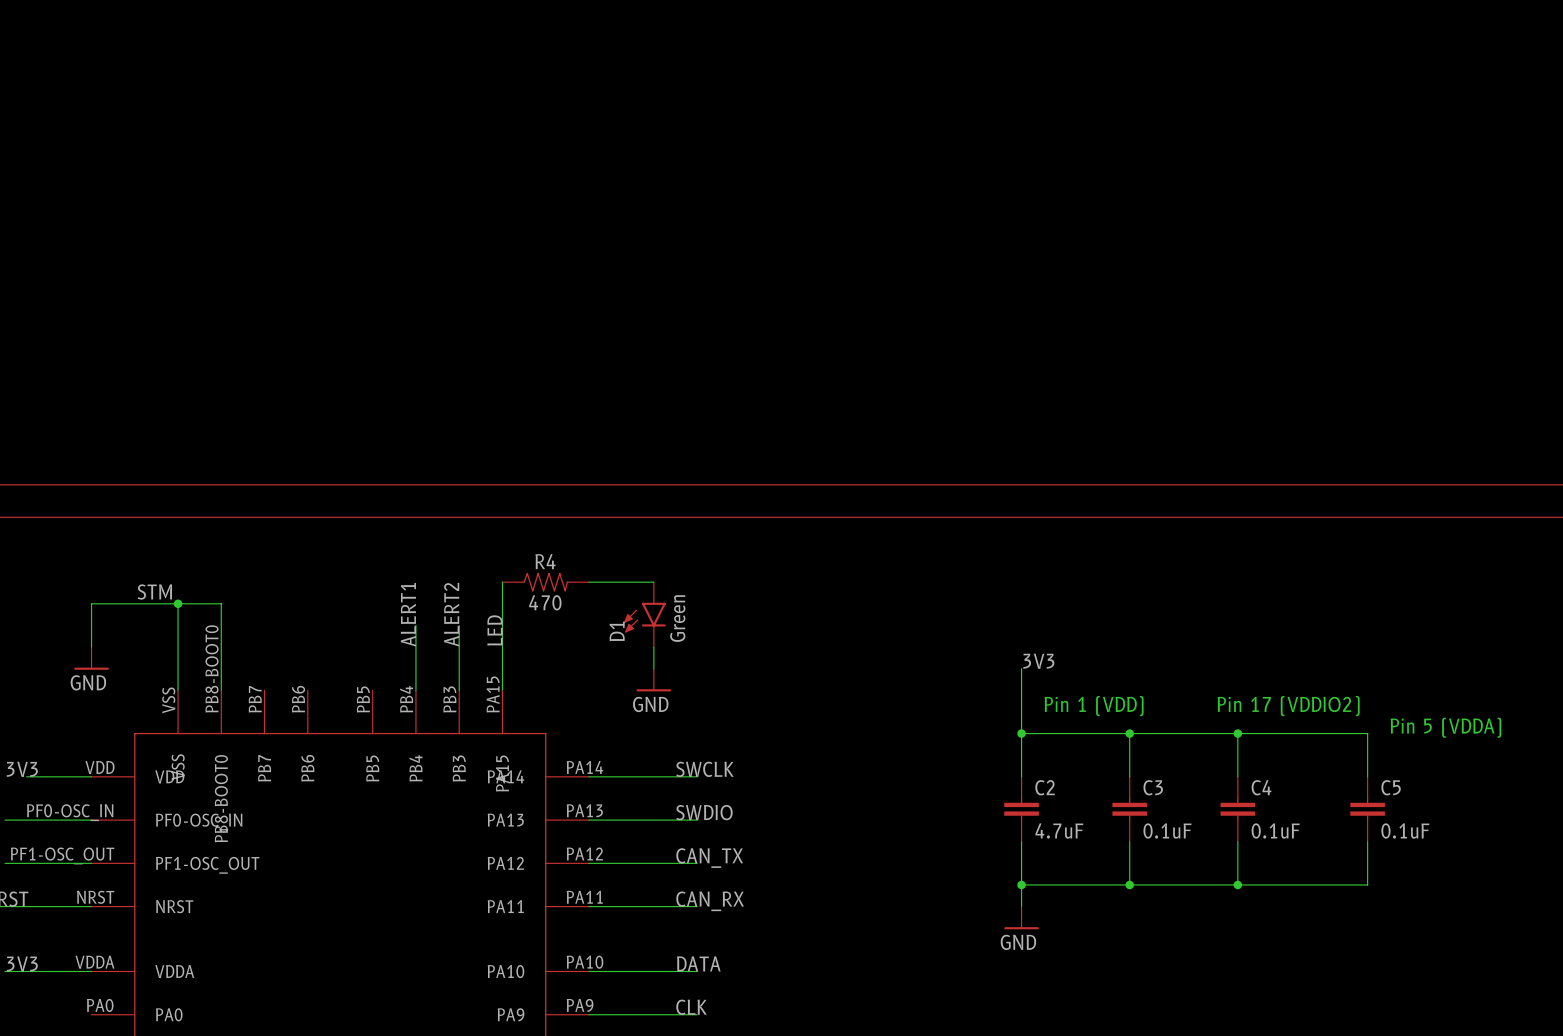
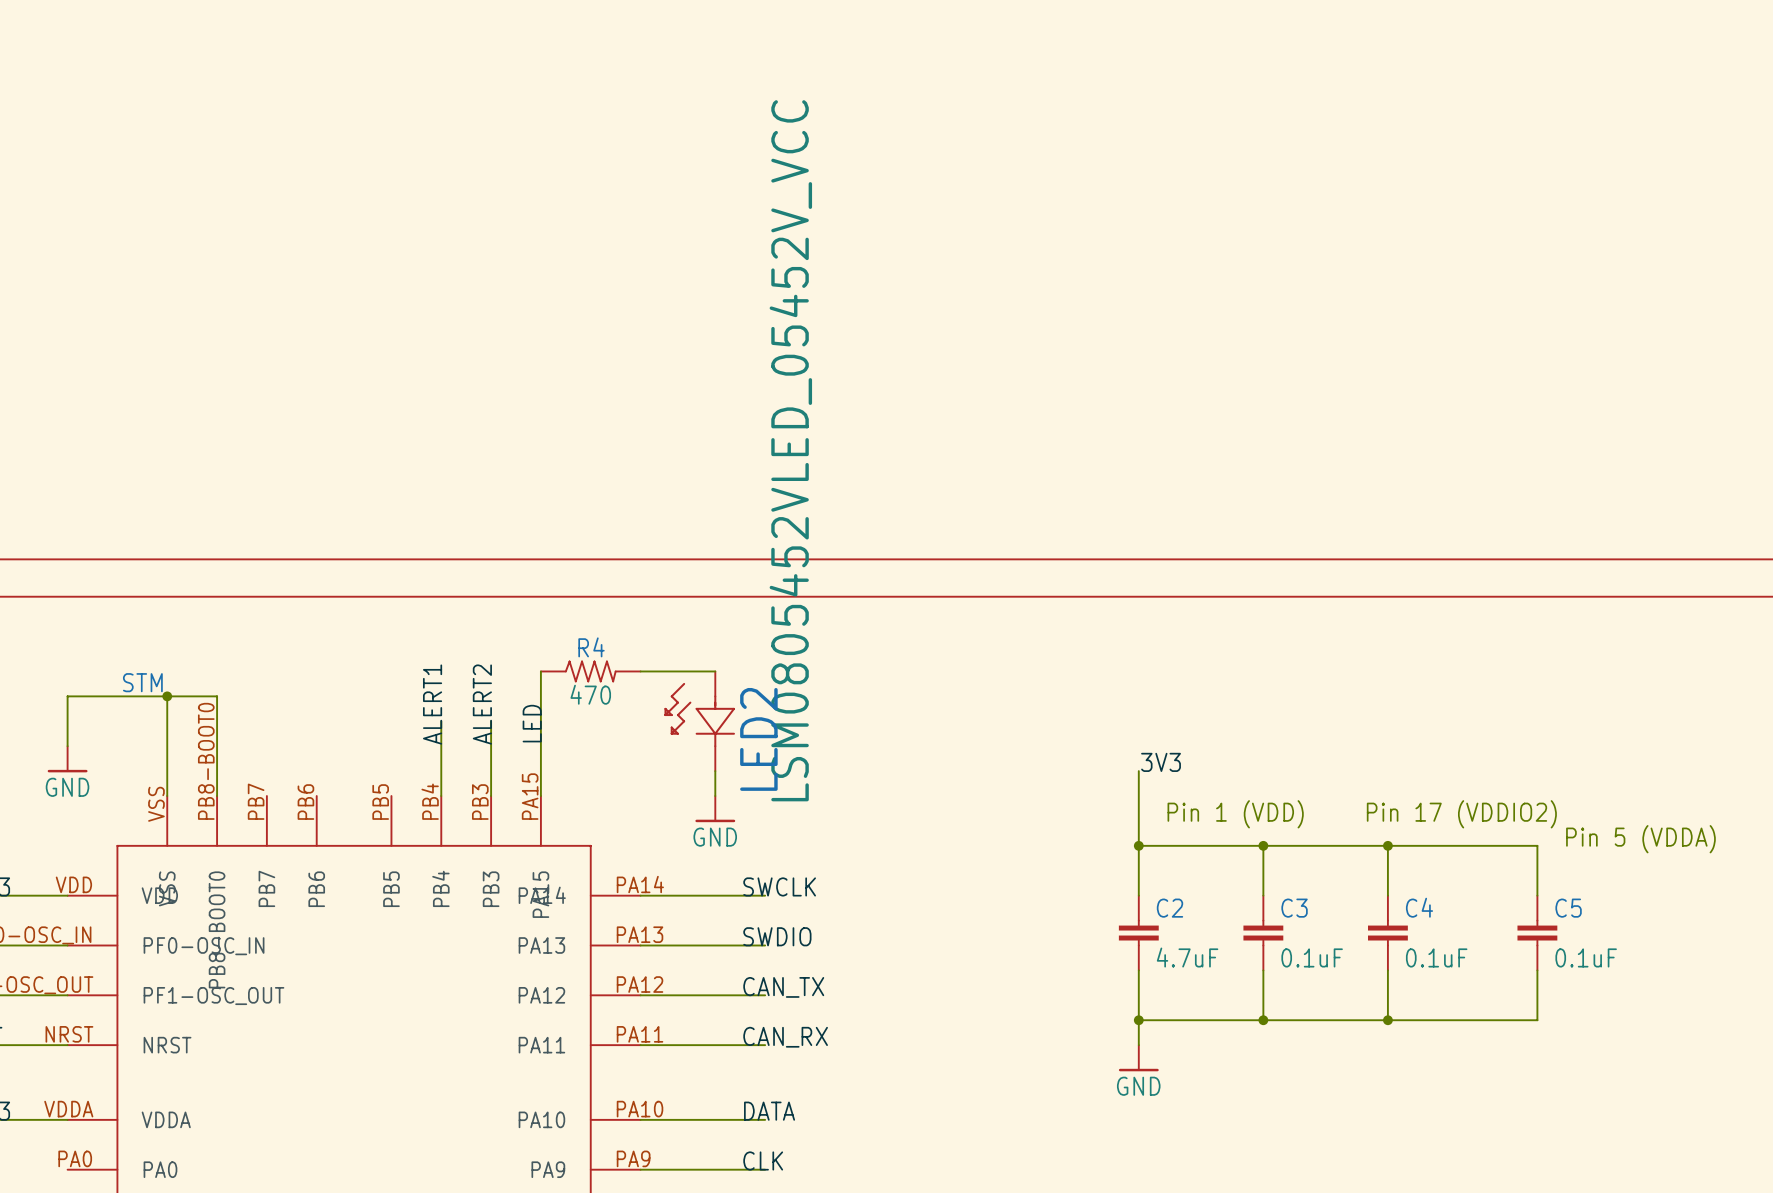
D1: Green (644, 614) -> none
LED2: none -> LSM0805452VLED_05452V_VCC (699, 721)
power symbol position: GND (653, 680) -> GND (715, 809)

